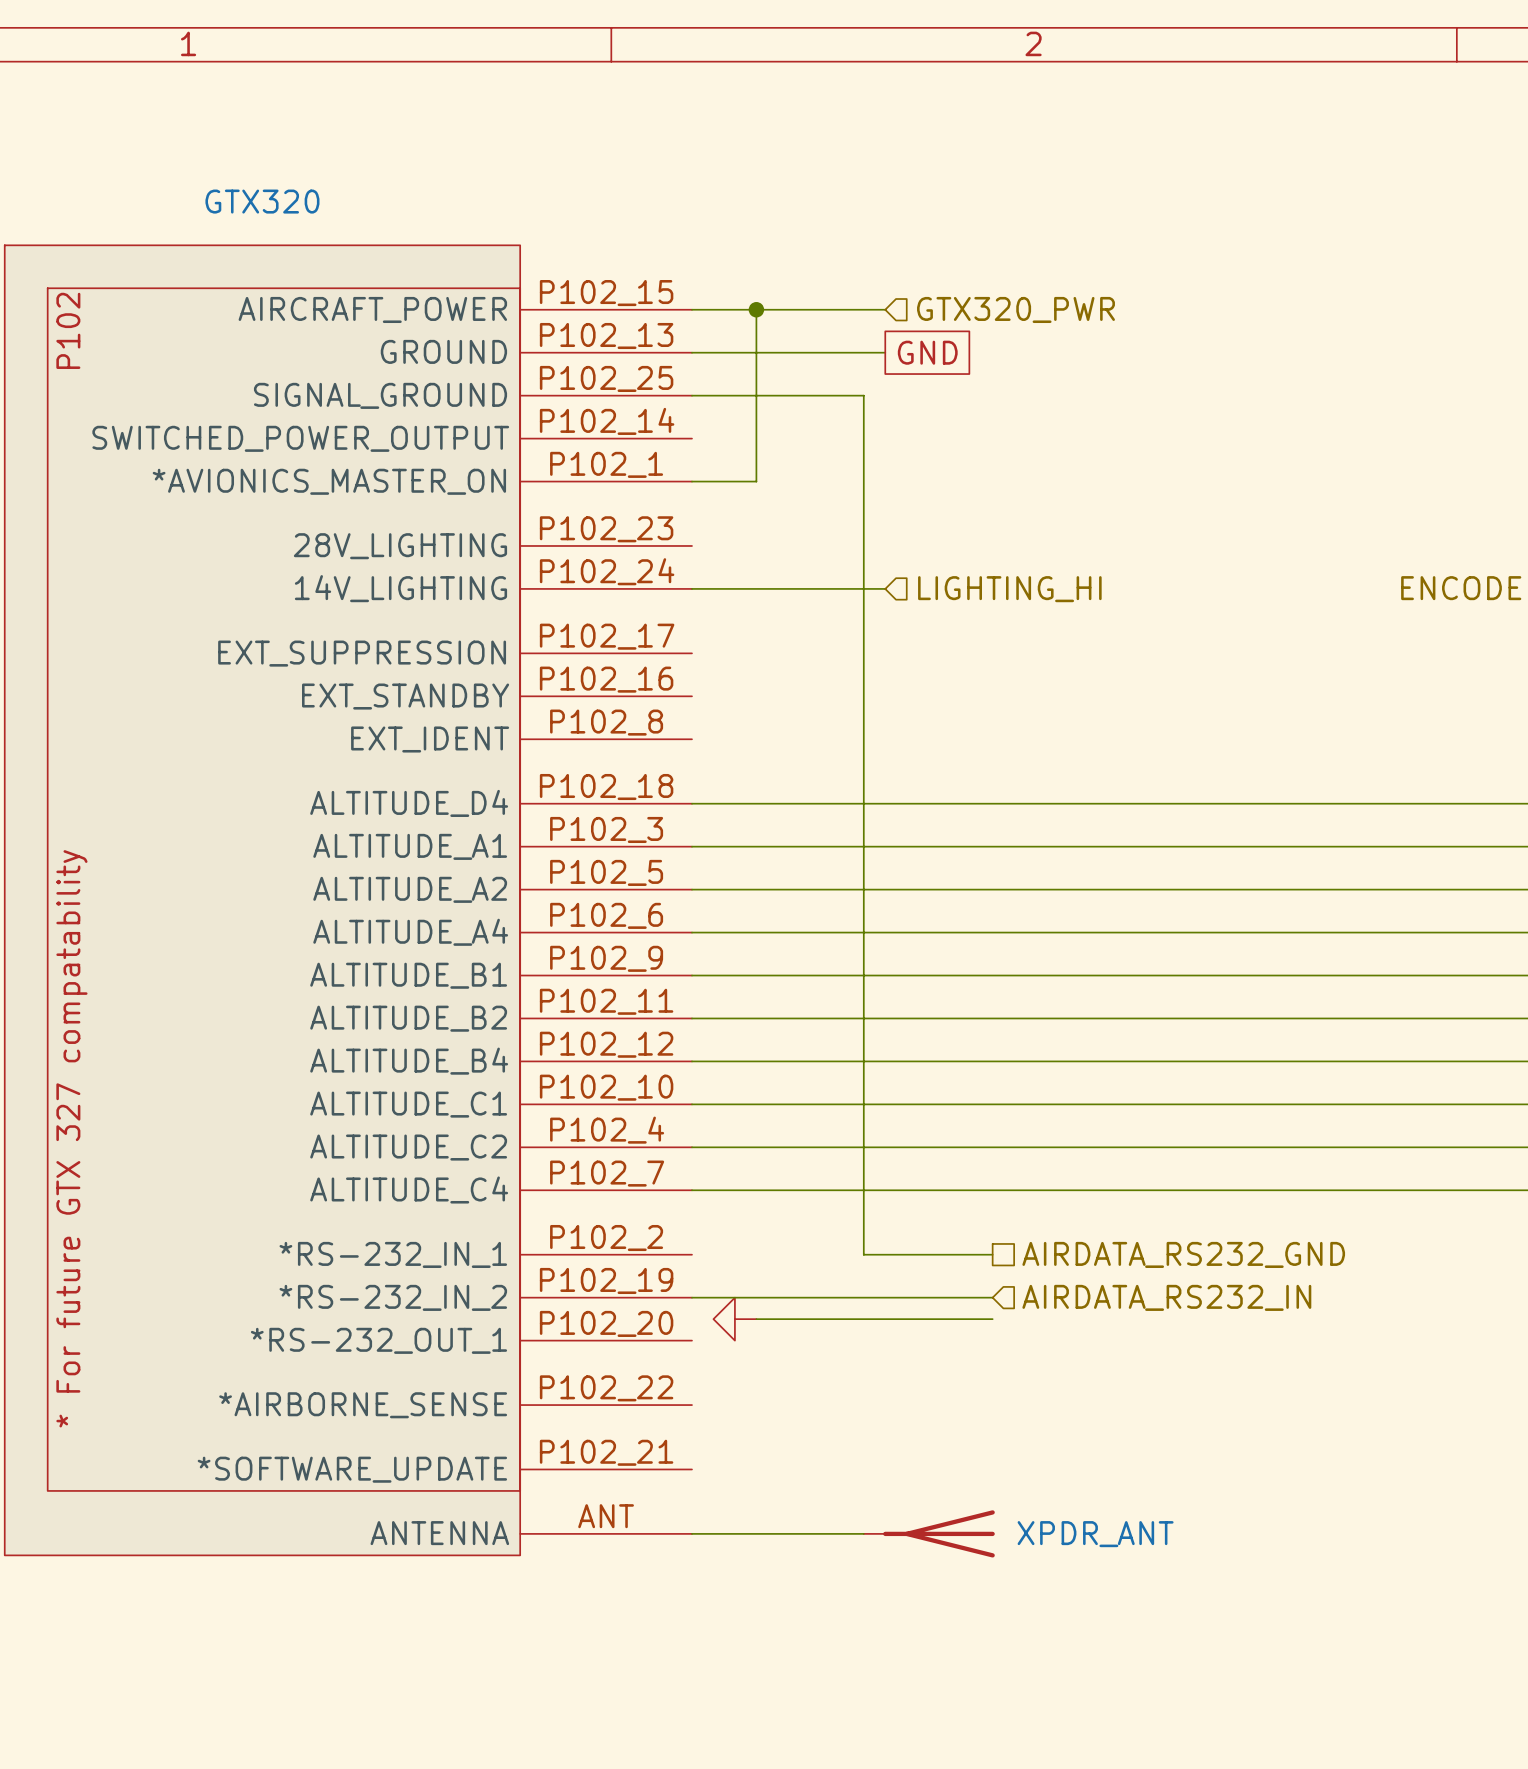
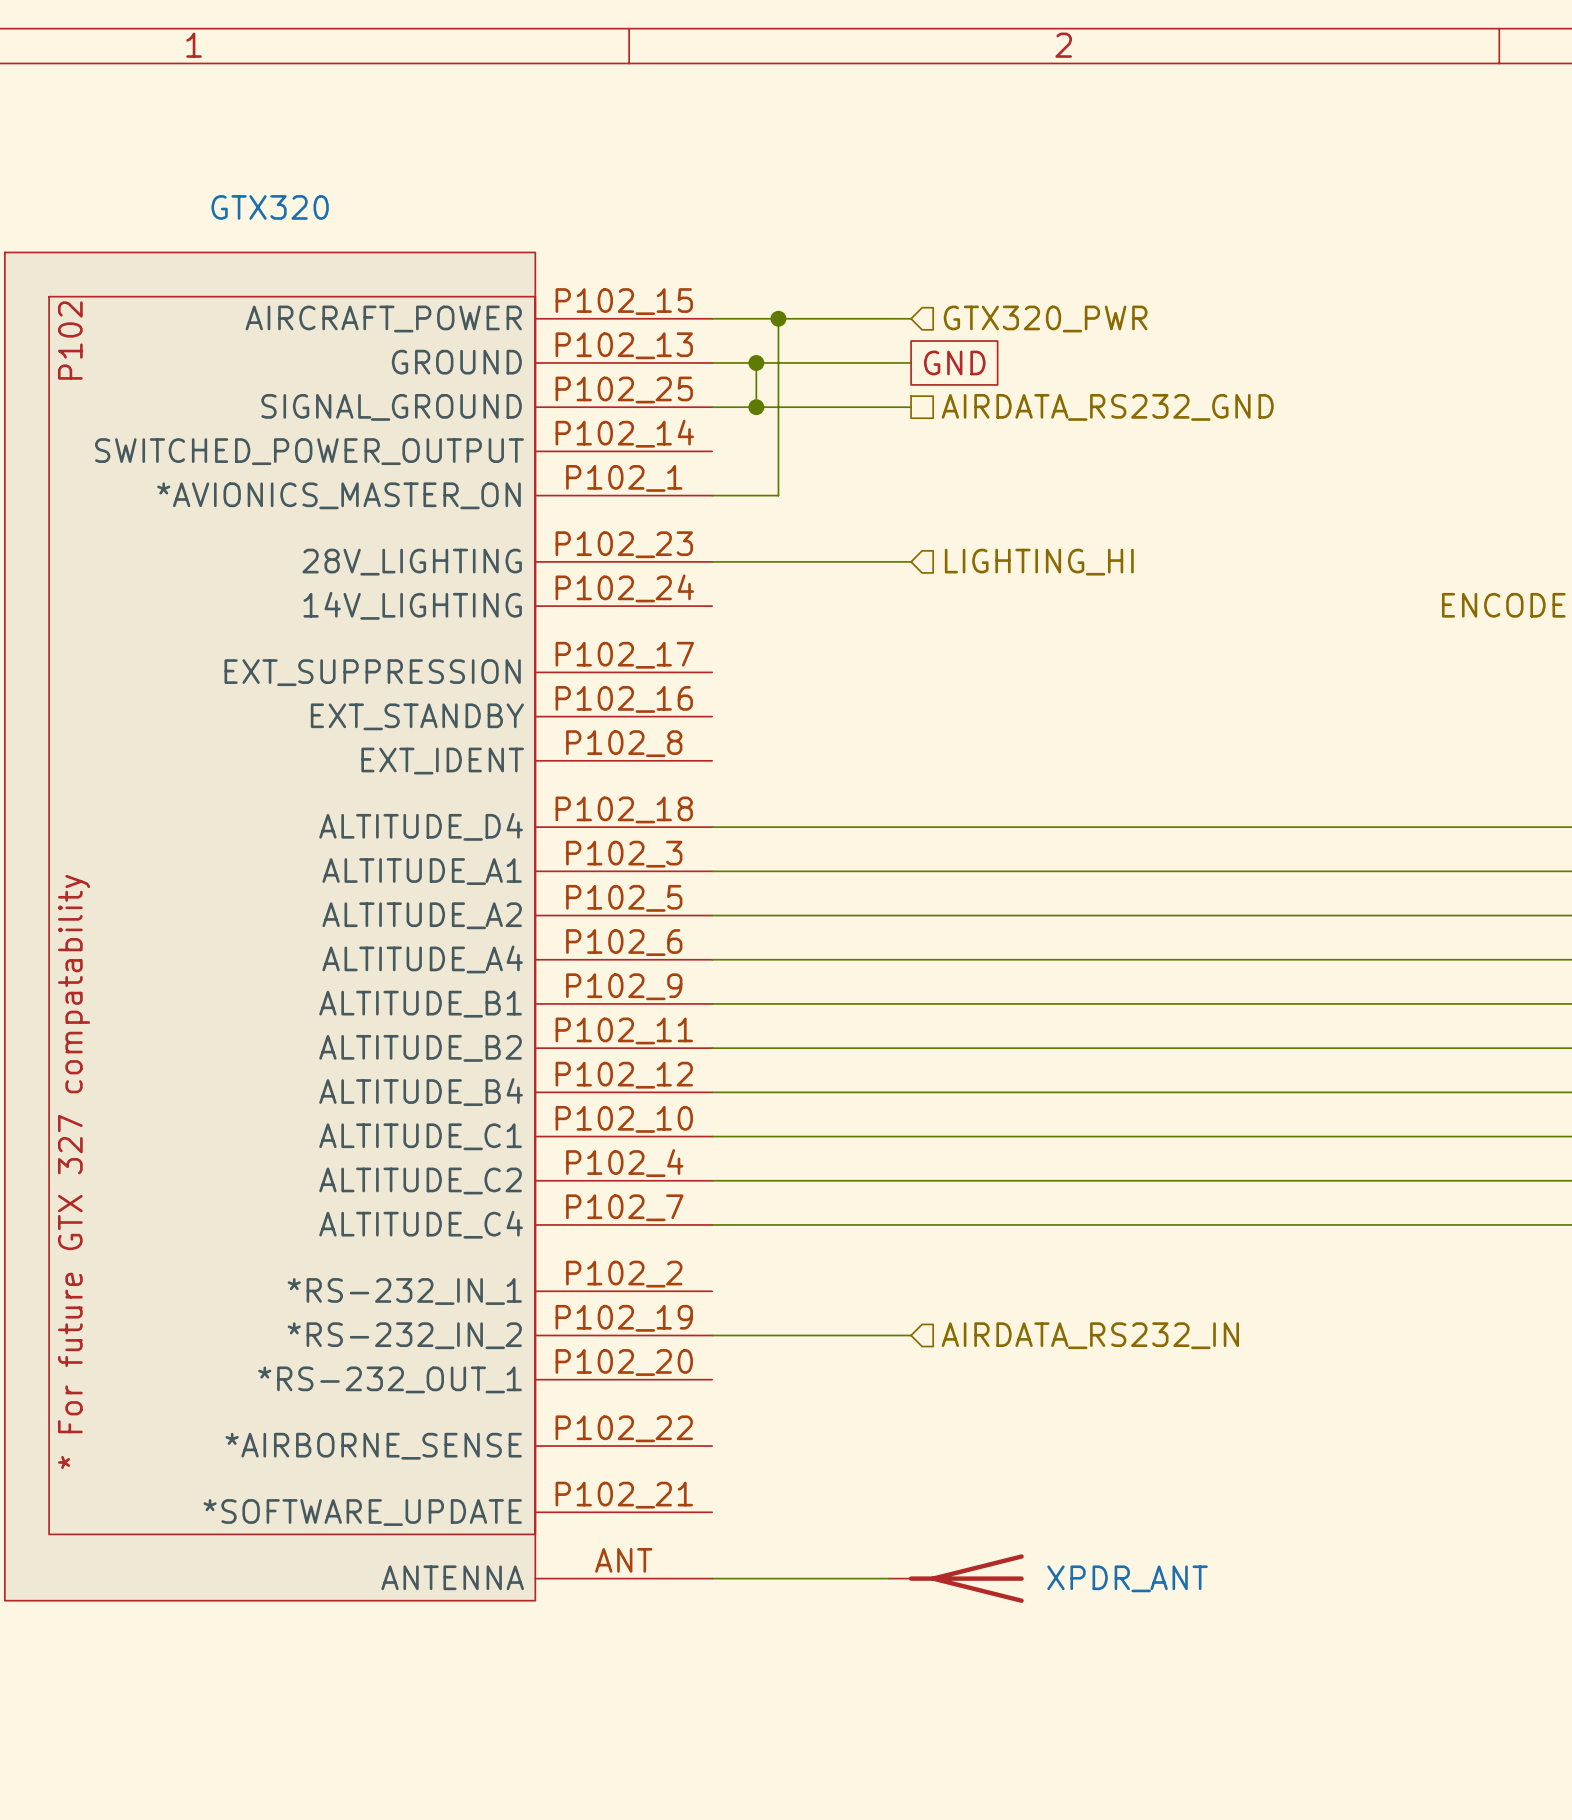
wire: none -> (756, 362) (756, 407)
junction: none -> (756, 362)
junction: none -> (756, 407)
wire: (863, 395) (863, 1254) (992, 1254) -> (888, 407) (911, 407)
hierarchical label: none -> AIRDATA_RS232_GND (1107, 407)
wire: (691, 588) (885, 588) -> (712, 561) (911, 561)
hierarchical label position: LIGHTING_HI (1009, 589) -> LIGHTING_HI (1039, 562)
hierarchical label: AIRDATA_RS232_GND (1183, 1254) -> none
wire: (885, 1297) (992, 1297) -> none
hierarchical label position: AIRDATA_RS232_IN (1166, 1297) -> AIRDATA_RS232_IN (1090, 1335)
power symbol: (734, 1319) -> none
wire: (756, 1319) (992, 1319) -> none

